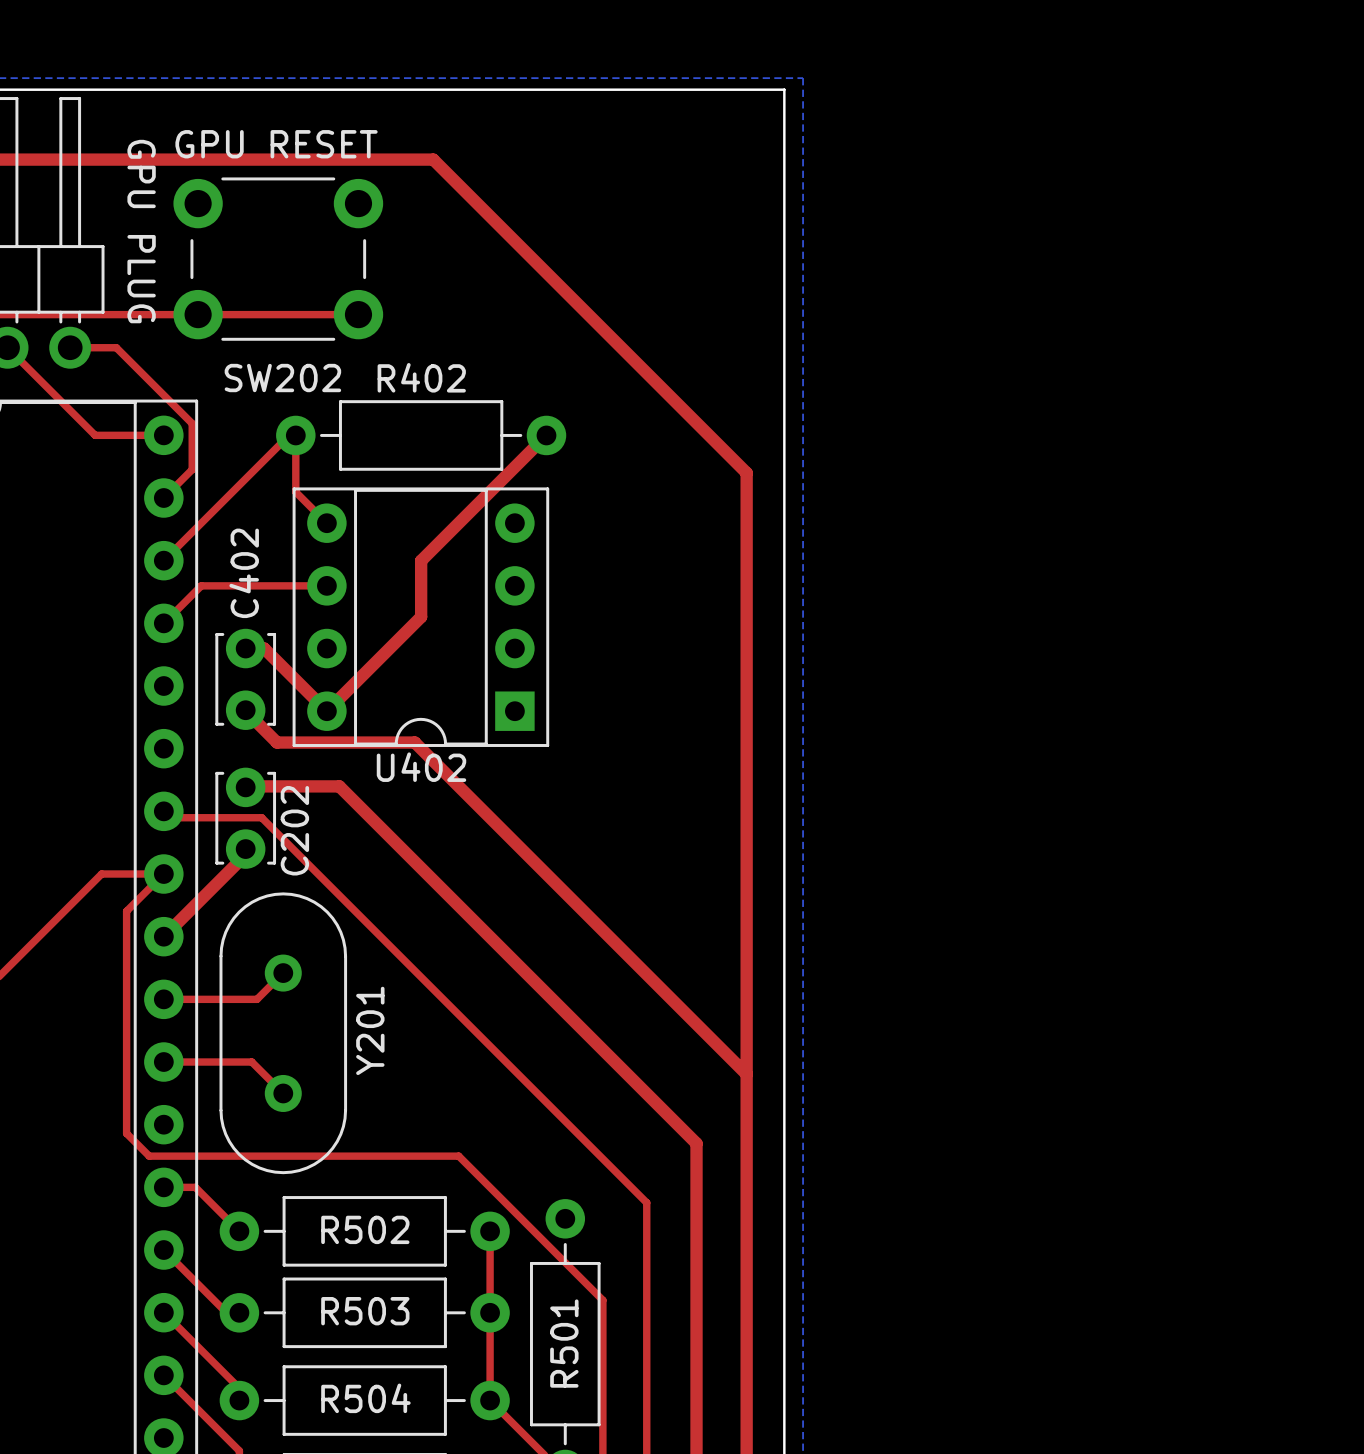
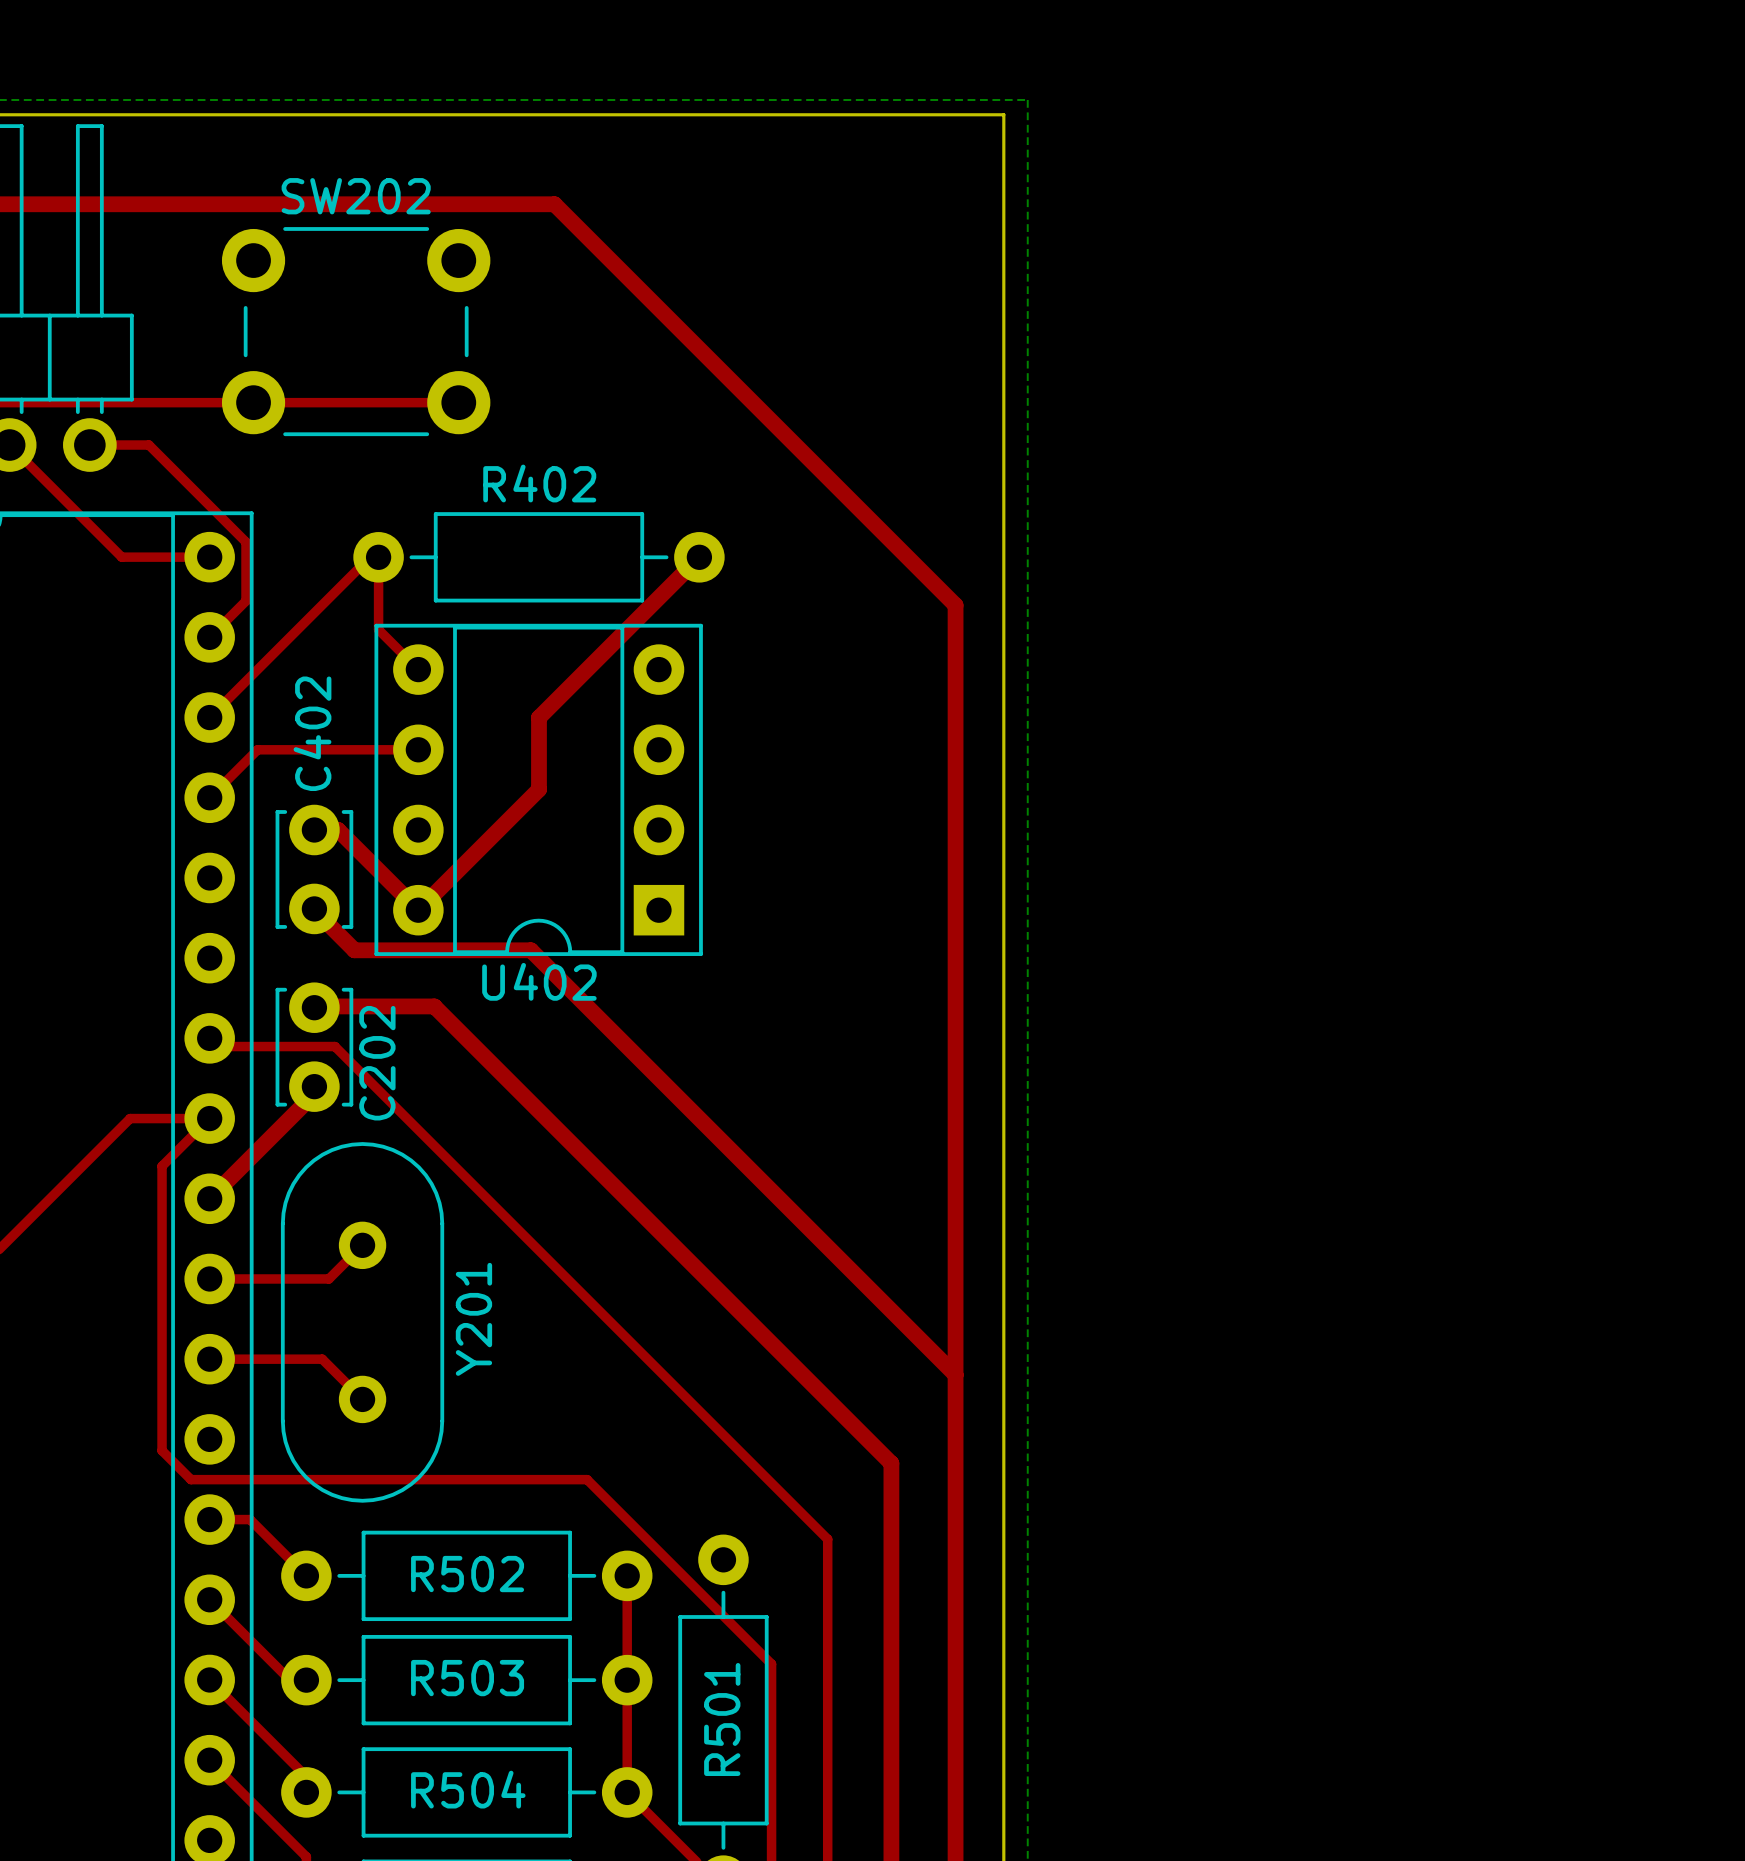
text: GPU RESET (276, 144) -> none
text: GPU PLUG (141, 231) -> none
SW202 name position: SW202 (282, 378) -> SW202 (356, 196)

